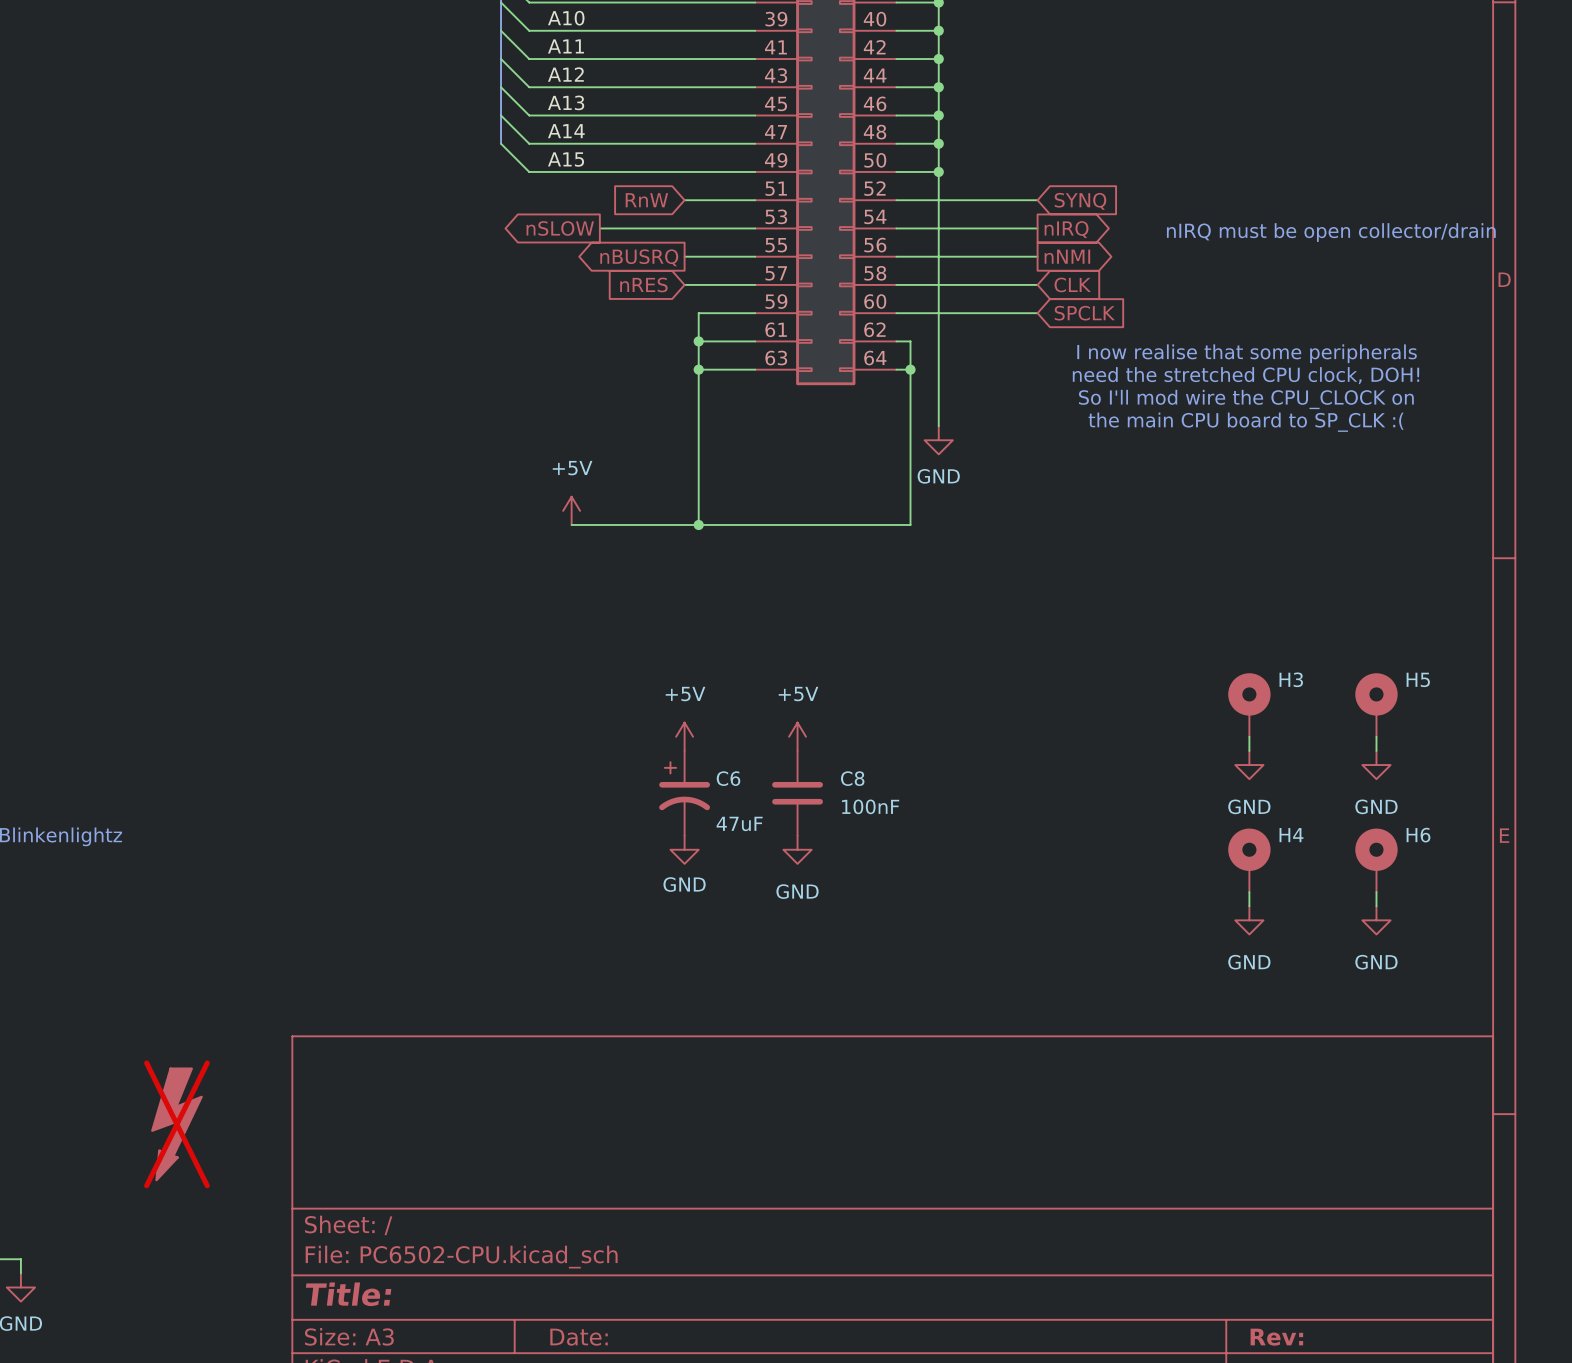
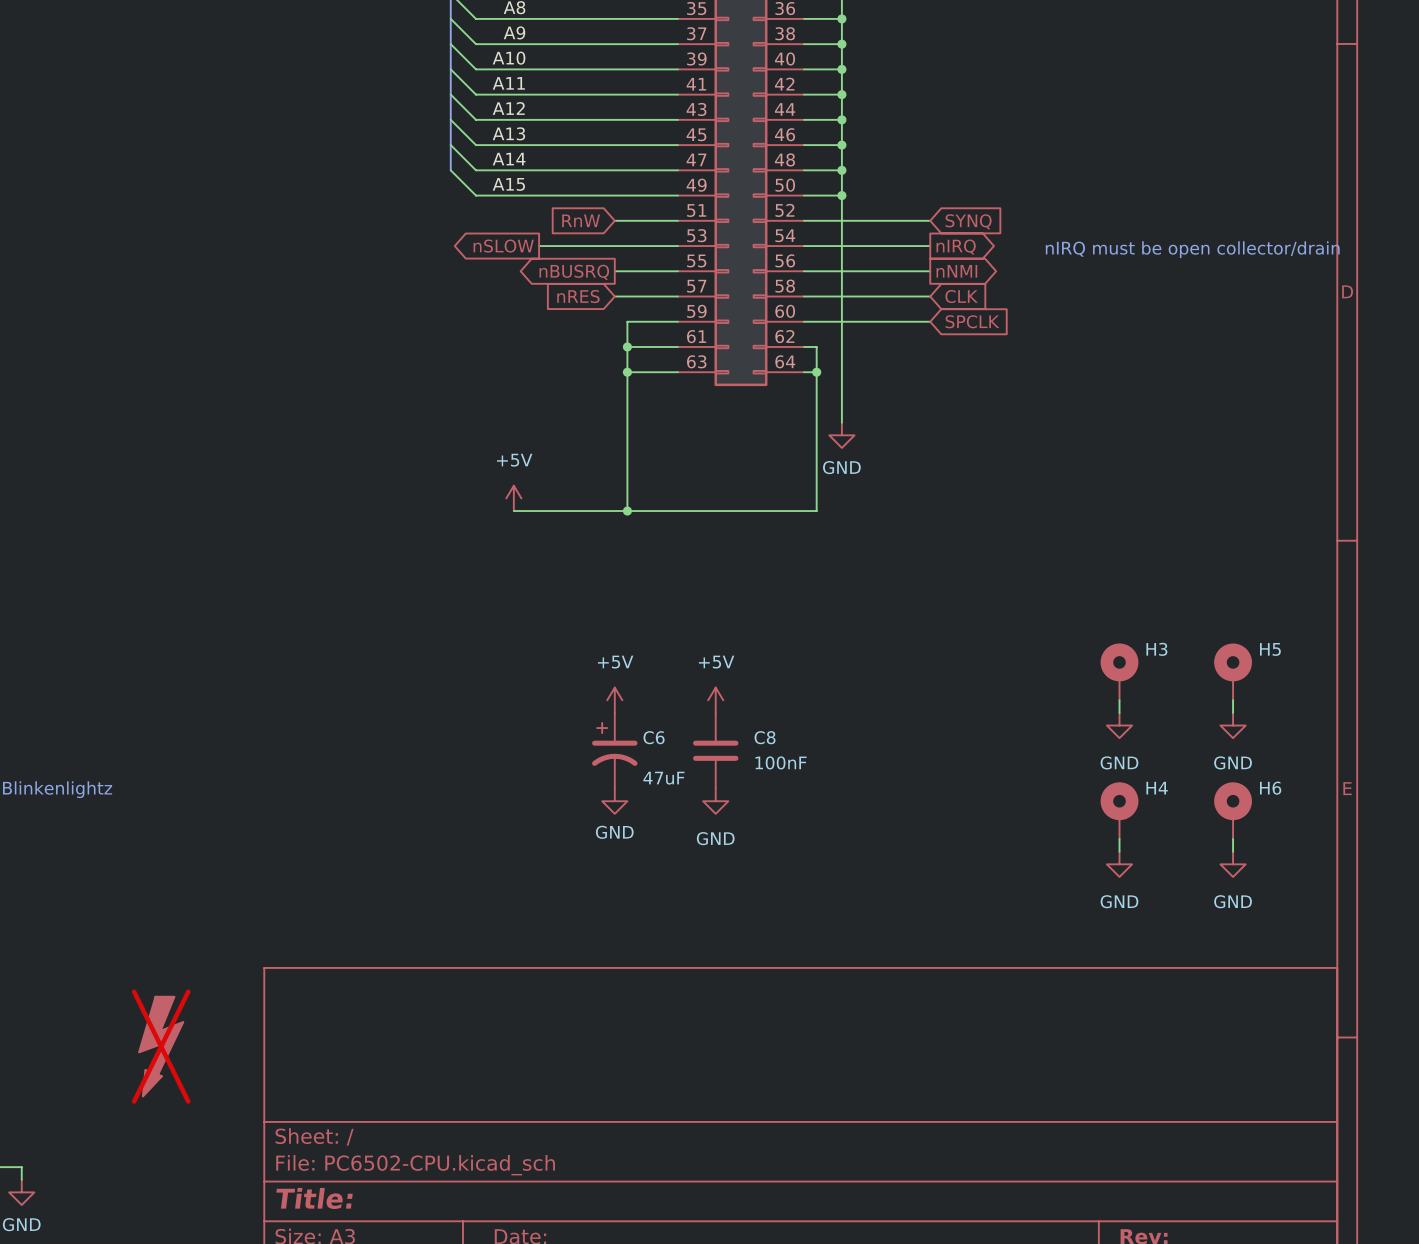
text: I now realise that some peripherals (1247, 353) -> none
text: need the stretched CPU clock, DOH! (1245, 375) -> none
text: So I'll mod wire the CPU_CLOCK on (1246, 399) -> none
text: the main CPU board to SP_CLK :( (1246, 422) -> none

